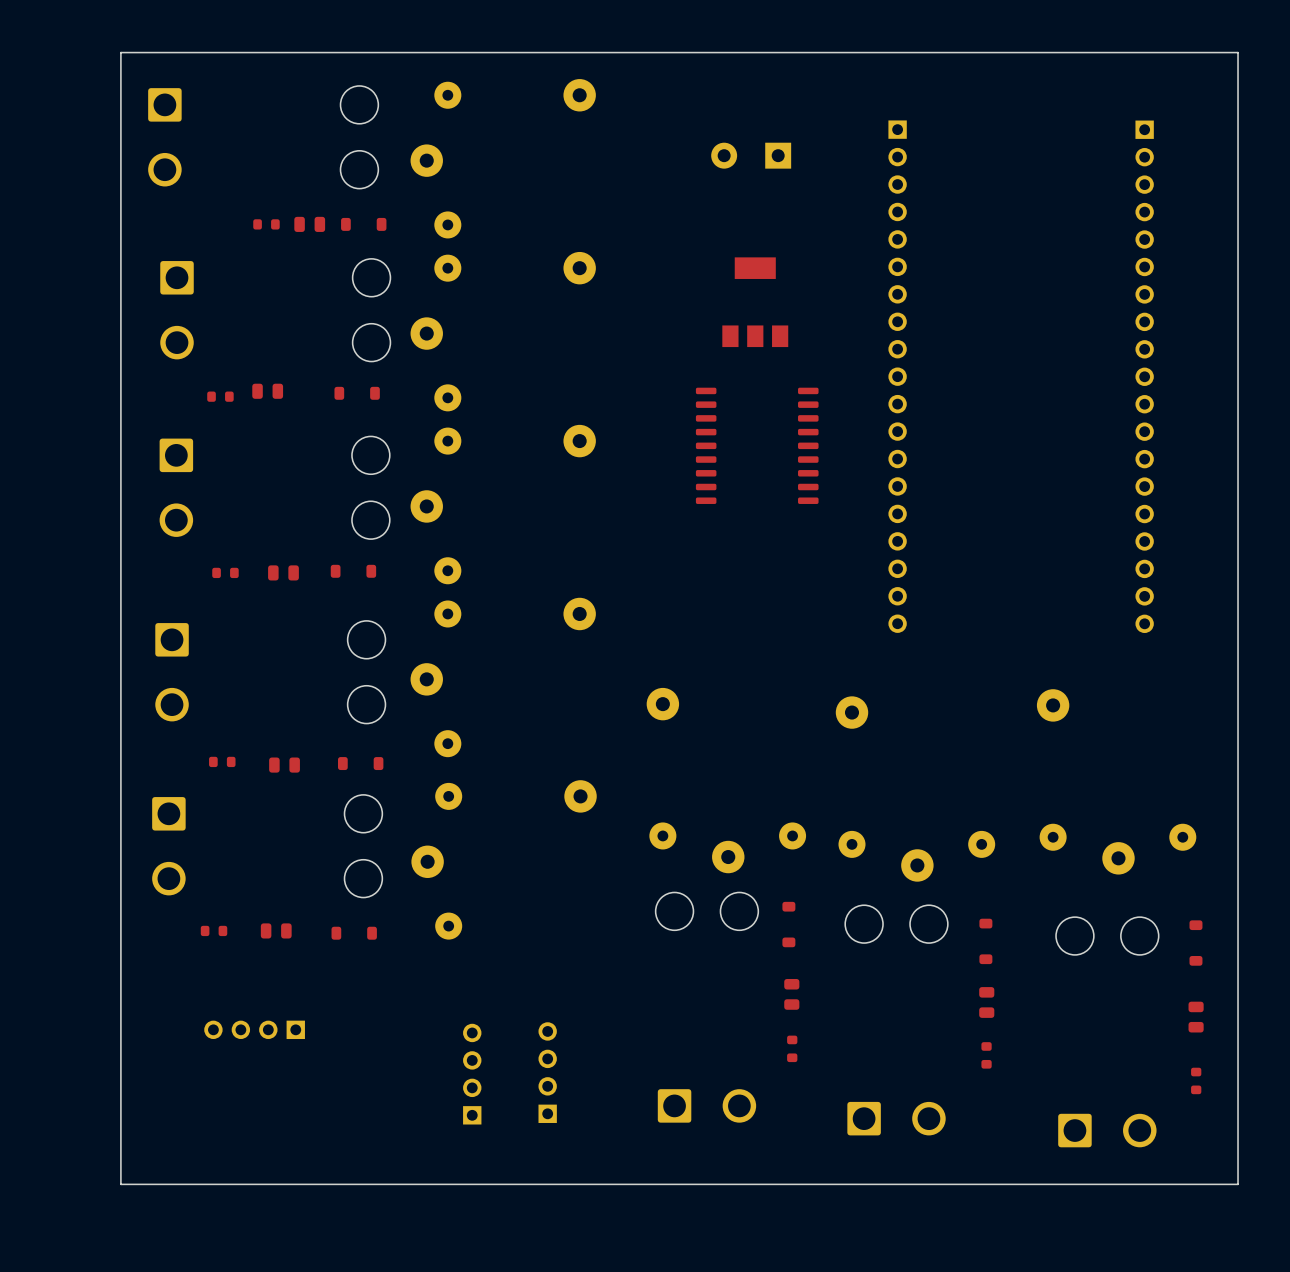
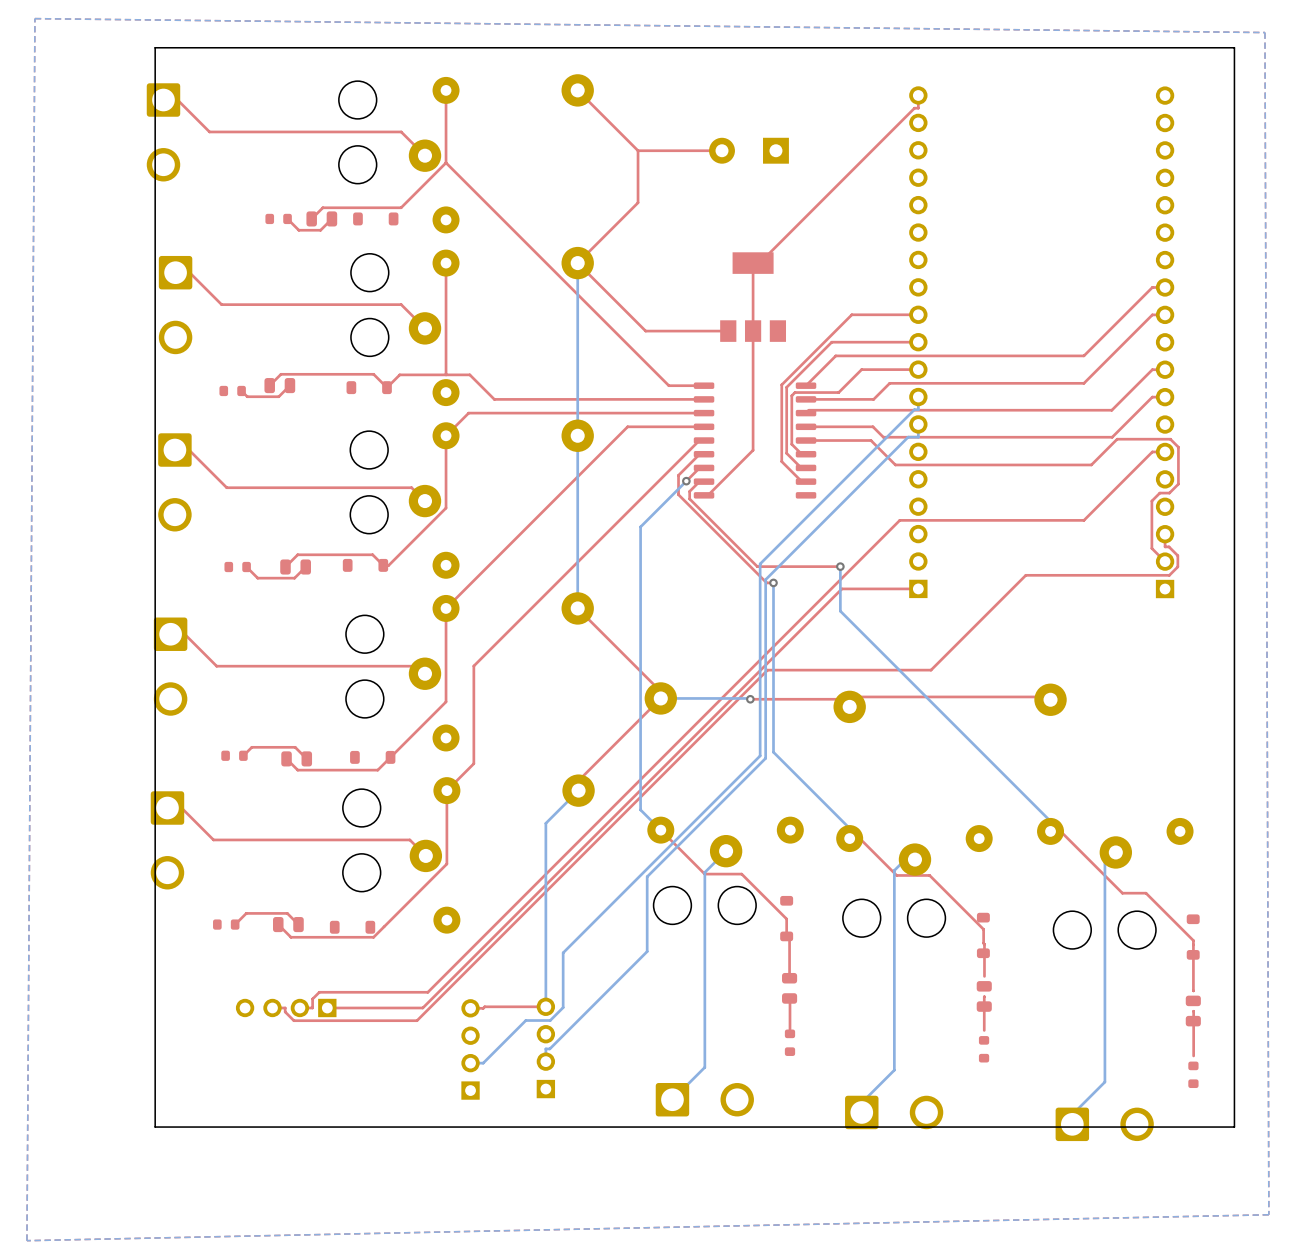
bottom zone outline: none -> (34, 18) (26, 1240) (1268, 1214) (1264, 32) (34, 18)
board edge: (1237, 52) (1238, 1184) (120, 1184) (120, 52) (156, 52) -> (1234, 47) (1234, 1127) (155, 1127) (155, 47)
top track: none -> (446, 90) (446, 162)
top track: none -> (577, 90) (638, 150)
top track: none -> (918, 95) (918, 108) (914, 108) (760, 263)
top track: none -> (177, 99) (209, 131) (401, 131) (424, 155)
top track: none -> (638, 150) (638, 202) (577, 263) (645, 331) (728, 331)
top track: none -> (722, 150) (638, 150)
top track: none -> (446, 162) (668, 385) (704, 385)
top track: none -> (446, 162) (401, 207) (322, 207) (311, 218)
top track: none -> (331, 218) (320, 230) (298, 230) (287, 218)
part position: (266, 224) -> (278, 218)
part position: (309, 224) -> (321, 218)
part position: (363, 224) -> (375, 218)
top track: none -> (446, 263) (446, 374)
bottom track: none -> (577, 263) (577, 608)
top track: none -> (760, 263) (753, 270) (753, 450) (707, 495) (704, 495)
top track: none -> (189, 272) (221, 304) (401, 304) (424, 328)
top track: none -> (1165, 287) (1152, 287) (1083, 355) (835, 355) (806, 385)
top track: none -> (918, 314) (851, 314) (781, 384) (781, 461) (801, 481) (806, 481)
top track: none -> (1165, 314) (1152, 314) (1083, 383) (889, 383) (873, 399) (806, 399)
top track: none -> (918, 342) (831, 342) (786, 387) (786, 453) (801, 467) (806, 467)
top track: none -> (918, 369) (861, 369) (838, 392) (795, 392) (791, 395) (791, 444) (801, 454) (806, 454)
top track: none -> (1165, 369) (1152, 369) (1111, 410) (808, 410) (806, 413)
part rotation: 0° (897, 376) -> 180° (918, 342)
part rotation: 0° (1144, 376) -> 180° (1165, 342)
top track: none -> (269, 385) (280, 374) (373, 374) (387, 387) (399, 374) (469, 374) (494, 399) (704, 399)
top track: none -> (289, 385) (278, 396) (247, 396) (241, 390)
part position: (267, 391) -> (279, 385)
part position: (357, 393) -> (369, 387)
part position: (220, 396) -> (232, 390)
bottom track: none -> (918, 397) (918, 409) (914, 409) (760, 563) (760, 755) (563, 952) (563, 1007) (550, 1020) (525, 1020) (483, 1063) (470, 1063)
top track: none -> (1165, 397) (1152, 397) (1112, 437) (883, 437) (872, 426) (806, 426)
top track: none -> (704, 413) (468, 413) (446, 435) (446, 508) (388, 565) (383, 565) (372, 554) (297, 554) (285, 567)
bottom track: none -> (918, 424) (918, 437) (908, 437) (765, 579) (765, 758) (647, 876) (647, 951) (549, 1048) (545, 1048) (545, 1061)
top track: none -> (704, 426) (627, 426) (446, 608) (446, 701) (377, 770) (297, 770) (286, 758)
top track: none -> (704, 440) (699, 440) (473, 666) (473, 763) (446, 790) (446, 863) (373, 937) (290, 937) (278, 924)
top track: none -> (806, 440) (870, 440) (895, 464) (1091, 464) (1117, 439) (1170, 439) (1178, 447) (1178, 484) (1169, 493) (1159, 493) (1151, 501) (1151, 548) (1165, 561)
top track: none -> (188, 449) (226, 487) (411, 487) (424, 501)
top track: none -> (1165, 451) (1152, 451) (1083, 520) (899, 520) (427, 992) (319, 992) (312, 999) (312, 1007) (299, 1007)
top track: none -> (704, 454) (699, 454) (678, 475) (678, 494) (766, 582) (773, 582)
top track: none -> (704, 467) (699, 467) (686, 481)
bottom track: none -> (686, 481) (640, 526) (640, 809) (660, 830)
via: none -> (686, 481)
top track: none -> (704, 481) (699, 481) (689, 491) (689, 498) (757, 566) (840, 566)
top track: none -> (1165, 534) (1165, 546) (1169, 546) (1177, 555) (1177, 566) (1169, 575) (1025, 575) (931, 670) (767, 670) (416, 1020) (293, 1020) (285, 1011) (285, 1007) (272, 1007)
part position: (353, 571) -> (365, 565)
part position: (225, 572) -> (237, 567)
part position: (283, 572) -> (295, 567)
top track: none -> (305, 567) (294, 578) (257, 578) (246, 567)
bottom track: none -> (840, 566) (840, 611) (1050, 821)
via: none -> (840, 566)
bottom track: none -> (773, 582) (773, 752) (849, 828)
via: none -> (773, 582)
top track: none -> (918, 588) (841, 588) (422, 1007) (327, 1007)
top track: none -> (577, 608) (660, 691) (660, 698) (578, 780) (578, 790)
top track: none -> (184, 633) (216, 666) (417, 666) (424, 673)
top track: none -> (1050, 689) (1043, 696) (849, 696) (847, 699) (750, 699)
bottom track: none -> (660, 698) (750, 699)
via: none -> (750, 699)
part position: (222, 761) -> (234, 755)
top track: none -> (243, 755) (251, 747) (295, 747) (306, 758)
part position: (360, 763) -> (372, 757)
part position: (284, 765) -> (296, 758)
bottom track: none -> (578, 790) (545, 823) (545, 1006)
top track: none -> (181, 807) (213, 839) (409, 839) (425, 855)
top track: none -> (1050, 821) (1122, 893) (1146, 893) (1193, 940) (1193, 990)
top track: none -> (849, 828) (896, 875) (929, 875) (983, 929) (984, 976)
top track: none -> (660, 830) (704, 874) (741, 874) (786, 919) (786, 936) (789, 939) (789, 978)
bottom track: none -> (1116, 842) (1104, 853) (1104, 1082) (1072, 1114)
bottom track: none -> (915, 849) (894, 870) (894, 1070) (861, 1102)
bottom track: none -> (726, 851) (704, 872) (704, 1067) (672, 1099)
part position: (214, 930) -> (226, 924)
part position: (276, 930) -> (288, 924)
top track: none -> (298, 924) (287, 913) (246, 913) (235, 924)
top track: none -> (984, 996) (984, 1030)
top track: none -> (789, 998) (789, 1033)
top track: none -> (545, 1006) (470, 1008)
top track: none -> (1193, 1011) (1193, 1055)
part position: (254, 1029) -> (286, 1007)
part position: (547, 1072) -> (545, 1047)
part position: (472, 1074) -> (470, 1049)

